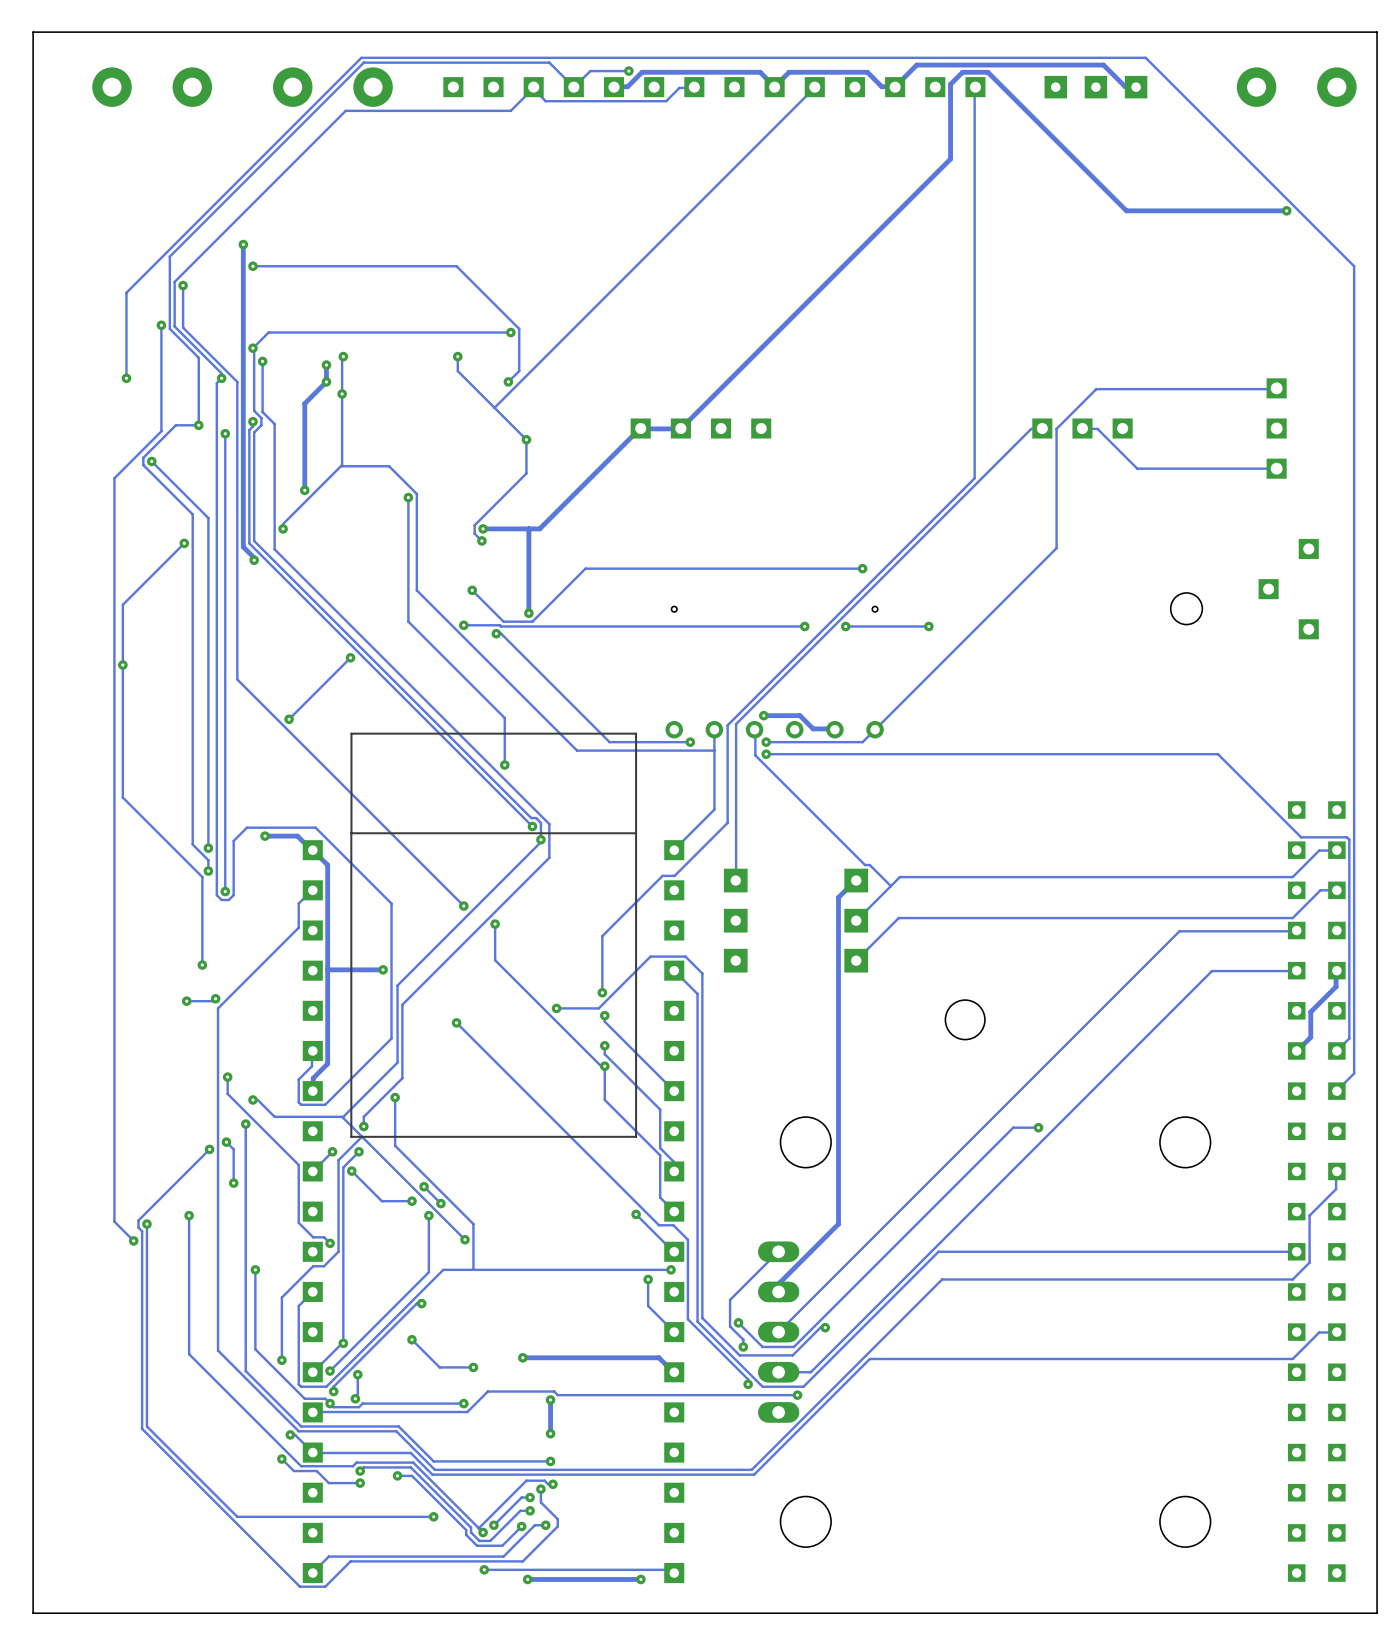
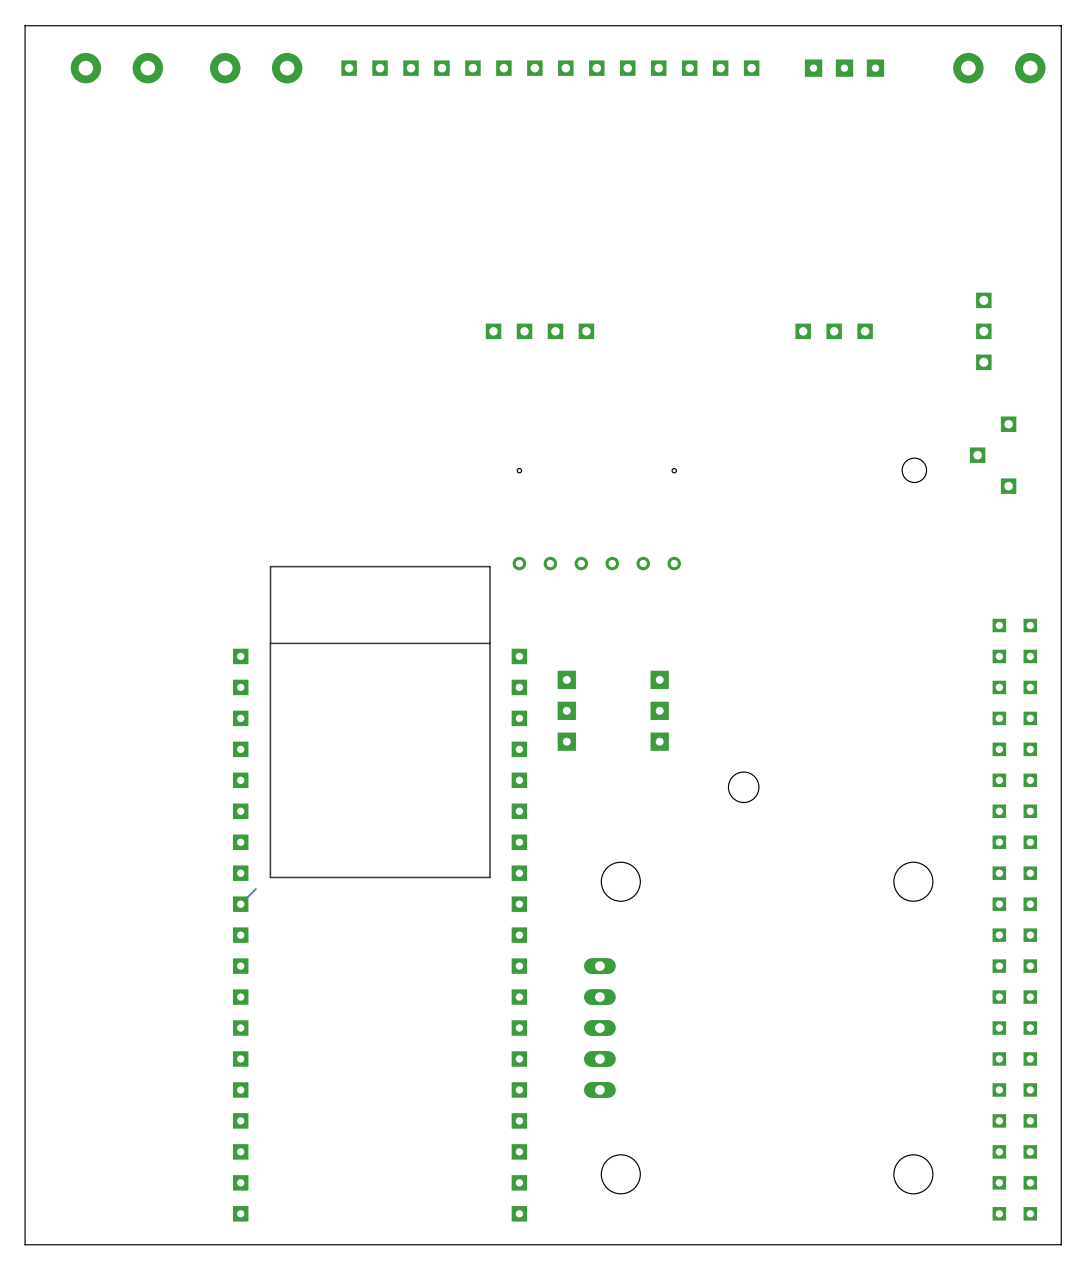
track: (628, 71) (590, 71) (573, 87) (549, 62) (363, 62) (169, 256) (169, 328) (198, 357) (198, 425) (175, 425) (143, 457) (143, 465) (192, 514) (192, 844) (208, 860) (208, 871) -> none
via: (628, 71) -> none
track: (533, 87) (510, 110) (345, 110) (174, 281) (174, 326) (221, 373) (221, 378) (216, 383) (216, 895) (221, 899) (228, 899) (233, 895) (233, 840) (246, 827) (315, 827) (391, 903) (391, 1038) (325, 1104) (301, 1104) (298, 1102) (298, 1079) (312, 1066) (312, 1050) -> none
track: (694, 87) (679, 87) (666, 101) (545, 101) (533, 87) -> none
track: (814, 87) (494, 407) -> none
track: (975, 87) (974, 478) (727, 725) (727, 822) (674, 875) (662, 875) (602, 936) (602, 992) -> none
track: (1136, 87) (1125, 86) (1103, 65) (916, 65) (895, 87) (881, 86) (867, 72) (789, 72) (774, 87) (760, 72) (642, 72) (627, 86) (614, 87) -> none
track: (1286, 210) (1126, 210) (987, 72) (962, 72) (950, 84) (950, 159) (681, 427) (639, 428) (539, 528) (483, 528) -> none
via: (1286, 210) -> none
track: (243, 244) (243, 546) (254, 557) (254, 560) -> none
via: (243, 244) -> none
track: (252, 266) (456, 266) (519, 328) (519, 371) (508, 381) -> none
via: (252, 266) -> none
track: (183, 285) (183, 327) (237, 381) (237, 679) (463, 906) -> none
via: (183, 285) -> none
track: (161, 325) (161, 431) (114, 478) (114, 1221) (133, 1240) -> none
via: (161, 325) -> none
track: (510, 332) (268, 332) (252, 348) (254, 410) (261, 418) (261, 425) (254, 432) (254, 540) (531, 818) (536, 818) (540, 822) (540, 842) (397, 985) (397, 1062) (342, 1117) -> none
via: (510, 332) -> none
via: (252, 348) -> none
track: (343, 356) (342, 465) (283, 524) (283, 528) -> none
via: (343, 356) -> none
track: (457, 356) (457, 371) (526, 439) (526, 473) (474, 525) (474, 533) (481, 540) -> none
via: (457, 356) -> none
track: (262, 361) (262, 412) (274, 424) (274, 549) (549, 824) (549, 857) (402, 1004) (402, 1078) (363, 1116) (363, 1126) -> none
via: (262, 361) -> none
track: (326, 365) (326, 381) (304, 403) (304, 490) -> none
via: (326, 365) -> none
track: (126, 378) (126, 292) (361, 57) (1145, 57) (1354, 266) (1354, 1073) (1336, 1091) -> none
via: (126, 378) -> none
via: (221, 378) -> none
via: (326, 381) -> none
via: (508, 381) -> none
track: (1276, 388) (1096, 389) (1056, 428) (1056, 548) (862, 742) (766, 742) -> none
via: (342, 393) -> none
track: (252, 421) (252, 426) (249, 430) (249, 543) (532, 826) -> none
via: (252, 421) -> none
via: (198, 425) -> none
track: (1042, 428) (1031, 428) (736, 724) (735, 880) -> none
track: (1082, 428) (1097, 428) (1137, 468) (1276, 468) -> none
track: (225, 433) (225, 891) -> none
via: (225, 433) -> none
via: (526, 439) -> none
track: (151, 461) (208, 518) (208, 848) -> none
via: (151, 461) -> none
track: (341, 465) (389, 466) (416, 493) (416, 590) (577, 750) (714, 750) -> none
via: (304, 490) -> none
track: (408, 497) (408, 621) (504, 718) (504, 765) -> none
via: (408, 497) -> none
via: (283, 528) -> none
via: (483, 528) -> none
track: (528, 528) (528, 613) -> none
via: (481, 540) -> none
track: (184, 543) (122, 604) (122, 797) (202, 877) (202, 965) -> none
via: (184, 543) -> none
via: (254, 560) -> none
track: (862, 568) (585, 568) (532, 621) (503, 621) (472, 590) -> none
via: (862, 568) -> none
via: (472, 590) -> none
via: (528, 613) -> none
track: (463, 625) (804, 626) -> none
via: (463, 625) -> none
via: (804, 626) -> none
via: (845, 626) -> none
track: (928, 626) (845, 626) -> none
via: (928, 626) -> none
track: (496, 633) (501, 633) (609, 742) (690, 742) -> none
via: (496, 633) -> none
track: (350, 657) (289, 719) -> none
via: (350, 657) -> none
via: (122, 665) -> none
track: (763, 715) (799, 715) (813, 728) (834, 729) -> none
via: (763, 715) -> none
via: (289, 719) -> none
track: (714, 729) (714, 809) (674, 850) -> none
track: (754, 729) (755, 755) (865, 865) (869, 865) (890, 886) -> none
via: (690, 742) -> none
via: (766, 742) -> none
track: (766, 754) (1218, 754) (1301, 837) (1346, 837) (1349, 839) (1349, 1038) (1336, 1050) -> none
via: (766, 754) -> none
via: (504, 765) -> none
via: (532, 826) -> none
track: (265, 836) (297, 836) (327, 865) (327, 1063) (313, 1078) (312, 1091) -> none
via: (265, 836) -> none
via: (540, 839) -> none
via: (208, 848) -> none
track: (1336, 850) (1319, 850) (1292, 877) (899, 877) (856, 920) -> none
via: (208, 871) -> none
track: (856, 880) (838, 897) (838, 1224) (779, 1283) (778, 1291) -> none
track: (312, 890) (298, 903) (298, 927) (218, 1008) (218, 1350) (298, 1431) (396, 1431) (434, 1469) (751, 1469) (942, 1279) (1292, 1279) (1309, 1262) (1309, 1215) (1336, 1189) (1336, 1171) -> none
track: (1336, 890) (1320, 890) (1292, 918) (898, 918) (856, 960) -> none
via: (225, 891) -> none
via: (463, 906) -> none
track: (495, 924) (495, 960) (601, 1066) (604, 1066) (604, 1099) (660, 1155) (660, 1197) (674, 1211) -> none
via: (495, 924) -> none
track: (1296, 930) (1179, 931) (778, 1332) -> none
via: (202, 965) -> none
track: (383, 969) (327, 969) -> none
via: (383, 969) -> none
track: (674, 970) (697, 993) (697, 1321) (762, 1386) (803, 1386) (938, 1251) (1296, 1251) -> none
track: (1296, 970) (1211, 971) (810, 1372) (778, 1372) -> none
track: (1336, 970) (1336, 986) (1310, 1012) (1310, 1037) (1296, 1050) -> none
via: (602, 992) -> none
track: (215, 998) (213, 1001) (186, 1001) -> none
via: (215, 998) -> none
via: (186, 1001) -> none
track: (556, 1008) (598, 1008) (650, 956) (685, 956) (702, 973) (702, 1318) (739, 1355) (792, 1355) (820, 1327) (825, 1327) -> none
via: (556, 1008) -> none
track: (604, 1015) (604, 1021) (674, 1091) -> none
via: (604, 1015) -> none
track: (456, 1022) (658, 1225) (673, 1225) (687, 1239) (687, 1319) (748, 1379) (748, 1384) -> none
via: (456, 1022) -> none
track: (604, 1045) (604, 1054) (660, 1109) (660, 1148) (673, 1161) (674, 1171) -> none
via: (604, 1045) -> none
via: (604, 1066) -> none
track: (227, 1077) (227, 1093) (298, 1165) (298, 1222) (313, 1237) (324, 1237) (330, 1243) -> none
via: (227, 1077) -> none
track: (395, 1097) (395, 1145) (473, 1224) (473, 1269) -> none
via: (395, 1097) -> none
track: (252, 1099) (257, 1099) (274, 1116) (342, 1116) (465, 1239) -> none
via: (252, 1099) -> none
track: (245, 1124) (245, 1371) (301, 1426) (398, 1426) (433, 1461) (550, 1461) -> none
via: (245, 1124) -> none
via: (363, 1126) -> none
track: (1038, 1127) (1013, 1127) (793, 1346) (762, 1346) (738, 1322) -> none
via: (1038, 1127) -> none
track: (362, 1136) (338, 1160) (338, 1251) (324, 1266) (313, 1266) (281, 1297) (281, 1360) -> none
track: (226, 1142) (233, 1149) (233, 1183) -> none
via: (226, 1142) -> none
track: (209, 1149) (138, 1220) (138, 1227) (142, 1231) (142, 1428) (299, 1586) (325, 1586) (350, 1561) (522, 1561) (557, 1526) (557, 1519) (540, 1502) (540, 1489) -> none
via: (209, 1149) -> none
via: (332, 1151) -> none
track: (358, 1151) (343, 1167) (343, 1342) (312, 1372) -> none
via: (358, 1151) -> none
track: (351, 1171) (381, 1201) (412, 1201) -> none
via: (351, 1171) -> none
via: (233, 1183) -> none
track: (424, 1186) (440, 1203) -> none
via: (424, 1186) -> none
via: (412, 1201) -> none
via: (440, 1203) -> none
track: (636, 1214) (674, 1251) -> none
via: (636, 1214) -> none
track: (189, 1215) (189, 1354) (301, 1466) (352, 1466) (356, 1462) (413, 1462) (483, 1532) -> none
via: (189, 1215) -> none
track: (428, 1215) (428, 1272) (330, 1371) -> none
via: (428, 1215) -> none
track: (146, 1224) (146, 1426) (237, 1516) (433, 1516) -> none
via: (146, 1224) -> none
via: (465, 1239) -> none
via: (133, 1240) -> none
via: (330, 1243) -> none
track: (778, 1251) (730, 1299) (730, 1326) (743, 1339) (743, 1346) -> none
track: (255, 1269) (255, 1349) (304, 1398) (325, 1398) (333, 1407) (358, 1407) (362, 1403) (463, 1403) -> none
via: (255, 1269) -> none
track: (671, 1269) (443, 1269) (326, 1386) (301, 1386) (298, 1384) (298, 1305) (312, 1291) -> none
via: (671, 1269) -> none
track: (648, 1279) (648, 1305) (674, 1332) -> none
via: (648, 1279) -> none
track: (421, 1303) (416, 1303) (333, 1386) (333, 1391) -> none
via: (421, 1303) -> none
via: (738, 1322) -> none
via: (825, 1327) -> none
track: (1336, 1332) (1319, 1332) (1292, 1359) (869, 1359) (754, 1474) (432, 1474) (410, 1452) (313, 1452) (295, 1434) (290, 1434) -> none
track: (412, 1339) (439, 1367) (473, 1367) -> none
via: (412, 1339) -> none
via: (343, 1343) -> none
via: (743, 1346) -> none
track: (522, 1357) (658, 1357) (674, 1372) -> none
via: (522, 1357) -> none
via: (281, 1360) -> none
via: (473, 1367) -> none
via: (330, 1371) -> none
track: (357, 1374) (357, 1396) (355, 1398) -> none
via: (357, 1374) -> none
via: (748, 1384) -> none
via: (333, 1391) -> none
track: (797, 1395) (557, 1395) (554, 1391) (487, 1391) (467, 1412) (312, 1412) -> none
via: (797, 1395) -> none
via: (355, 1398) -> none
track: (550, 1399) (550, 1433) -> none
via: (550, 1399) -> none
via: (330, 1403) -> none
via: (463, 1403) -> none
via: (550, 1433) -> none
via: (290, 1434) -> none
track: (281, 1459) (293, 1471) (316, 1471) (328, 1483) (360, 1483) -> none
via: (281, 1459) -> none
via: (550, 1461) -> none
track: (360, 1471) (363, 1467) (410, 1467) (471, 1527) (471, 1532) (479, 1540) (490, 1540) (520, 1510) (530, 1510) -> none
via: (360, 1471) -> none
track: (397, 1475) (412, 1475) (466, 1530) (466, 1534) (477, 1545) (502, 1545) (521, 1526) -> none
via: (397, 1475) -> none
via: (360, 1483) -> none
track: (552, 1484) (548, 1484) (544, 1480) (526, 1480) (478, 1528) -> none
via: (552, 1484) -> none
via: (540, 1489) -> none
track: (530, 1497) (521, 1497) (493, 1525) -> none
via: (530, 1497) -> none
via: (530, 1510) -> none
via: (433, 1516) -> none
via: (493, 1525) -> none
track: (545, 1525) (534, 1525) (503, 1556) (328, 1556) (312, 1573) -> none
via: (545, 1525) -> none
via: (521, 1526) -> none
via: (483, 1532) -> none
track: (484, 1569) (671, 1569) (674, 1573) -> none
via: (484, 1569) -> none
via: (527, 1579) -> none
track: (640, 1579) (527, 1579) -> none
via: (640, 1579) -> none

